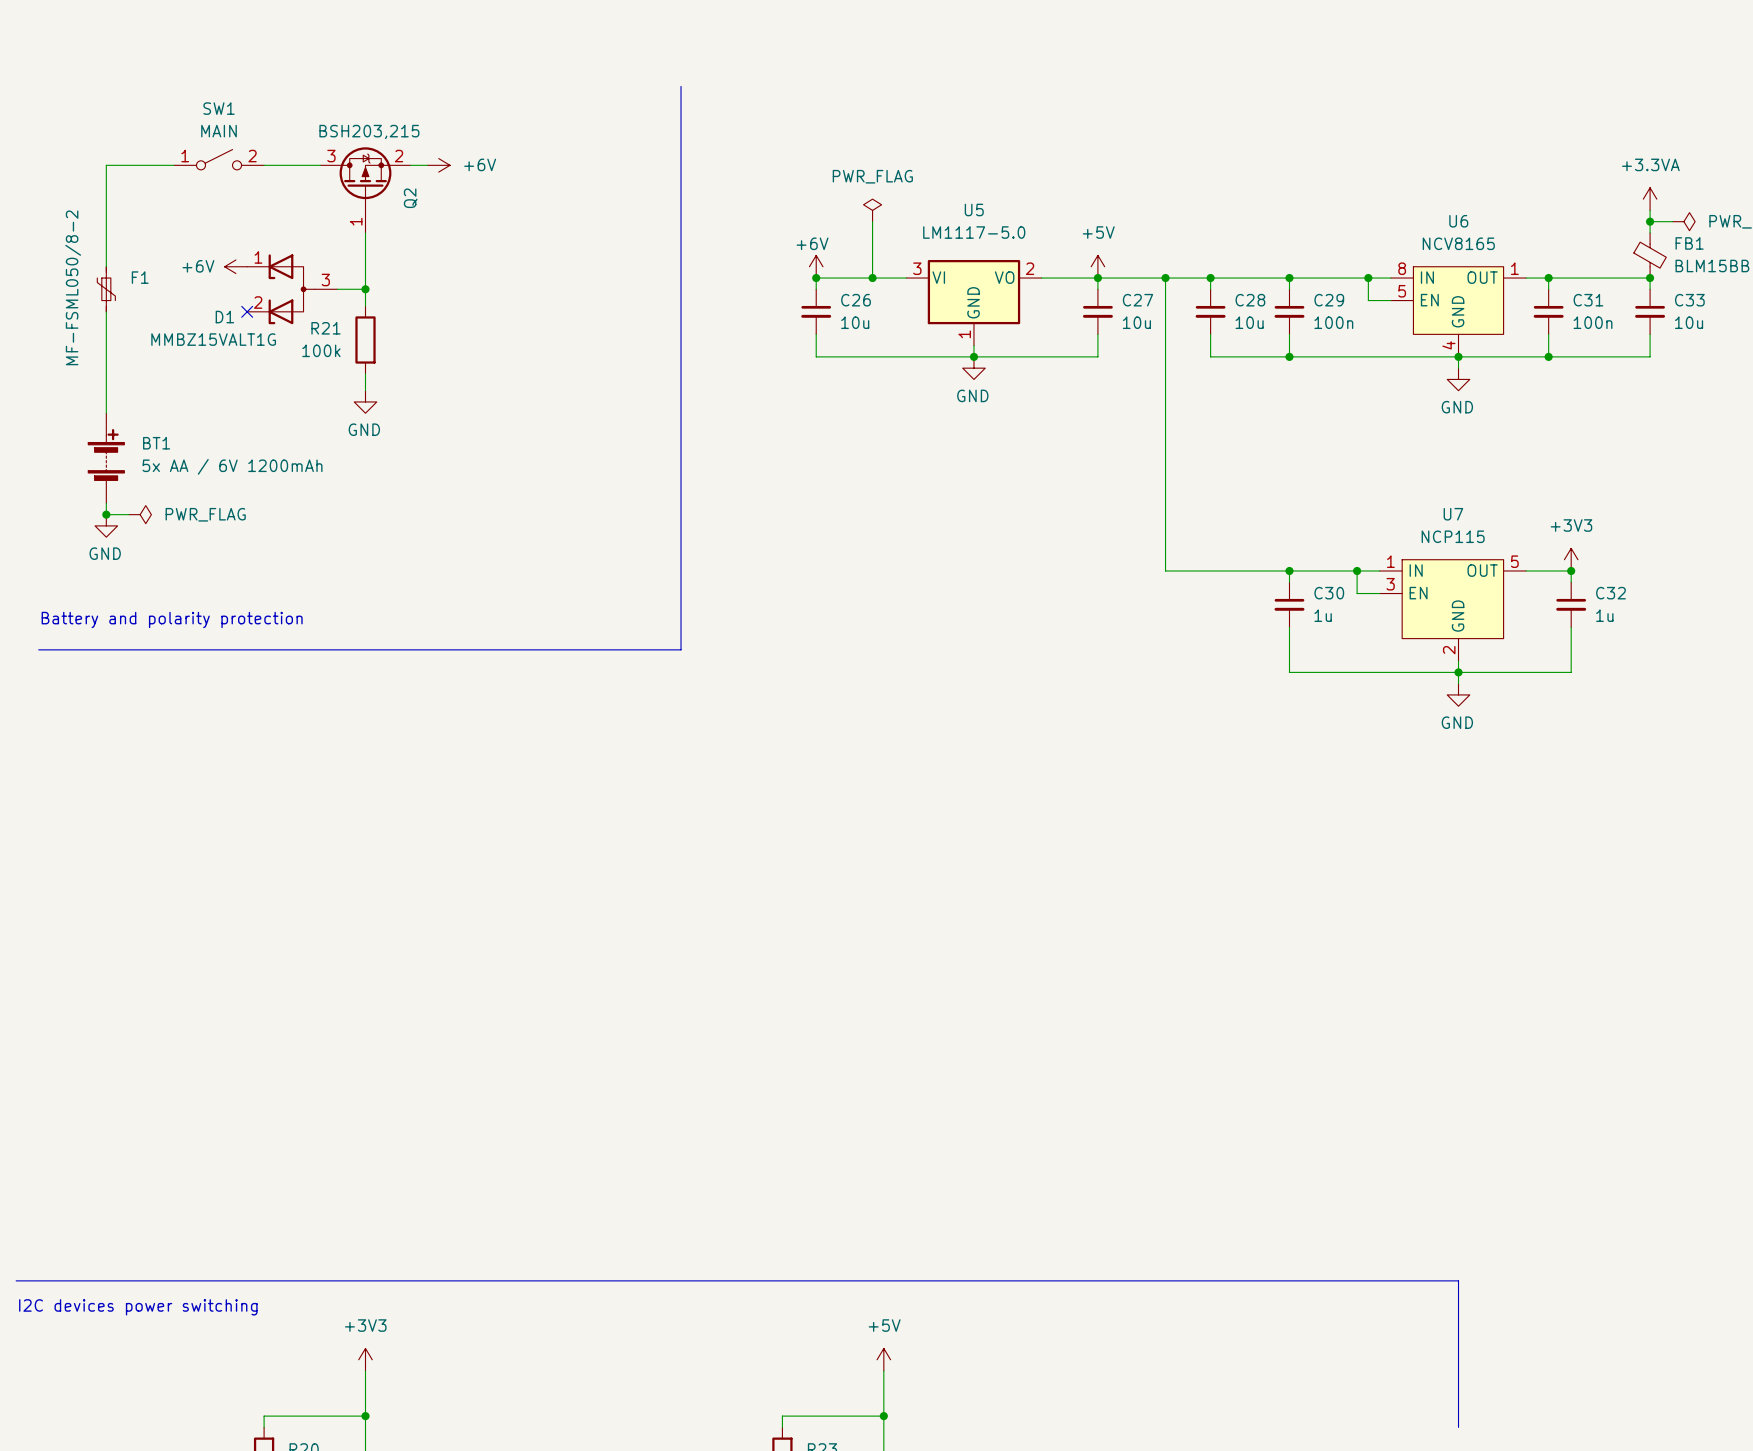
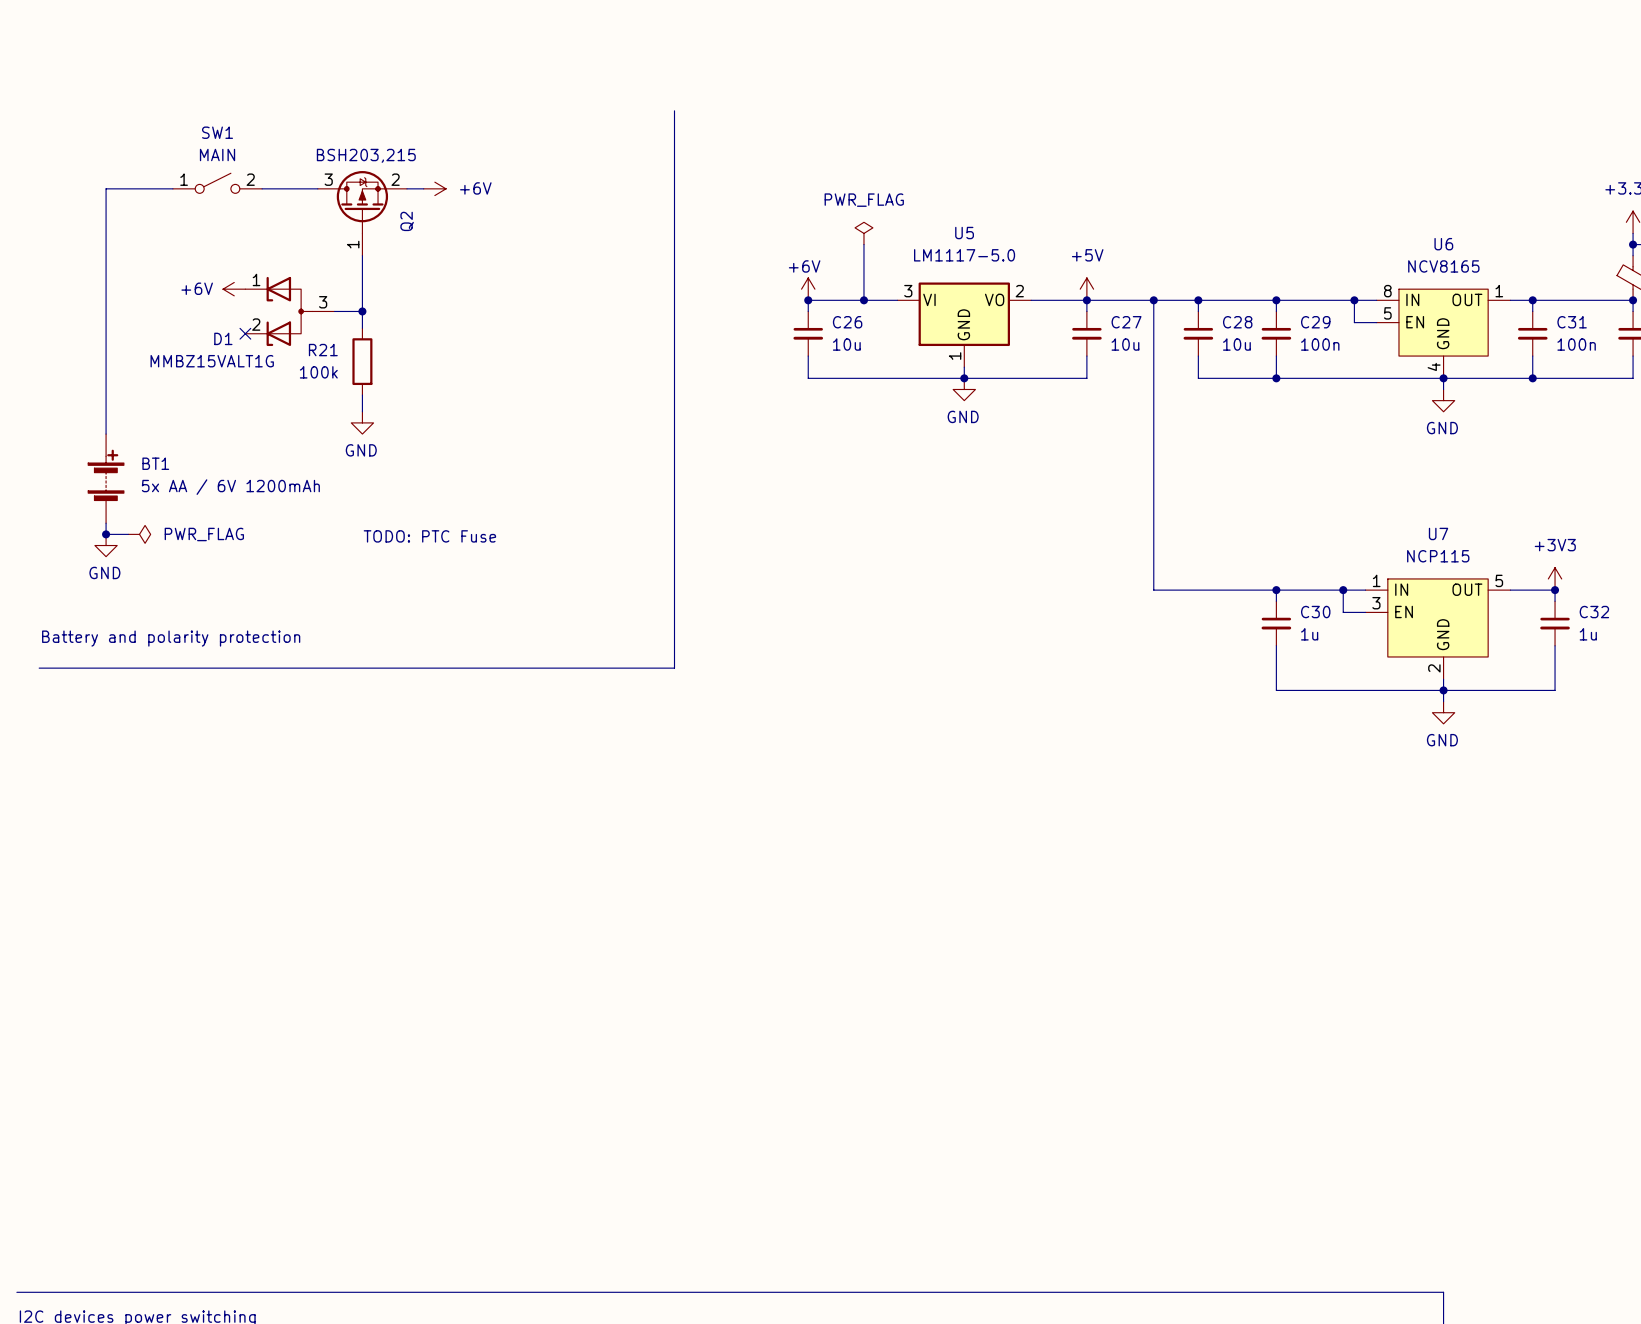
F1: MF-FSML050/8-2 (106, 289) -> none
text: none -> TODO: PTC Fuse (429, 536)

